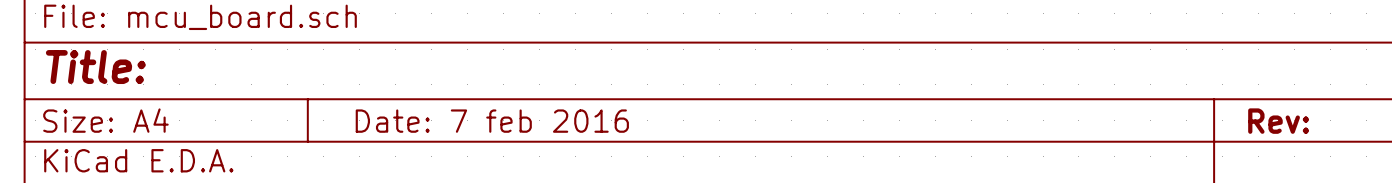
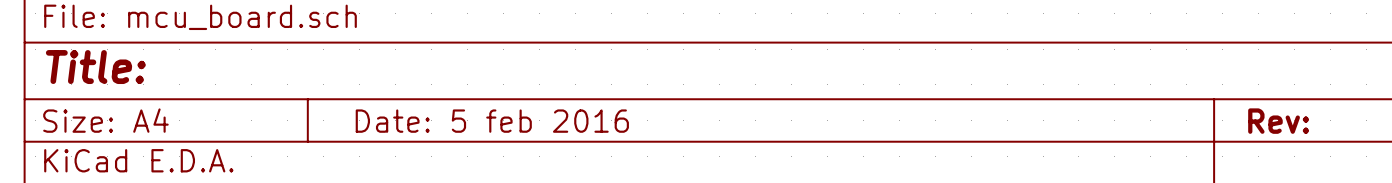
title block: Date: 7 feb 2016 (492, 121) -> Date: 5 feb 2016 (492, 121)

